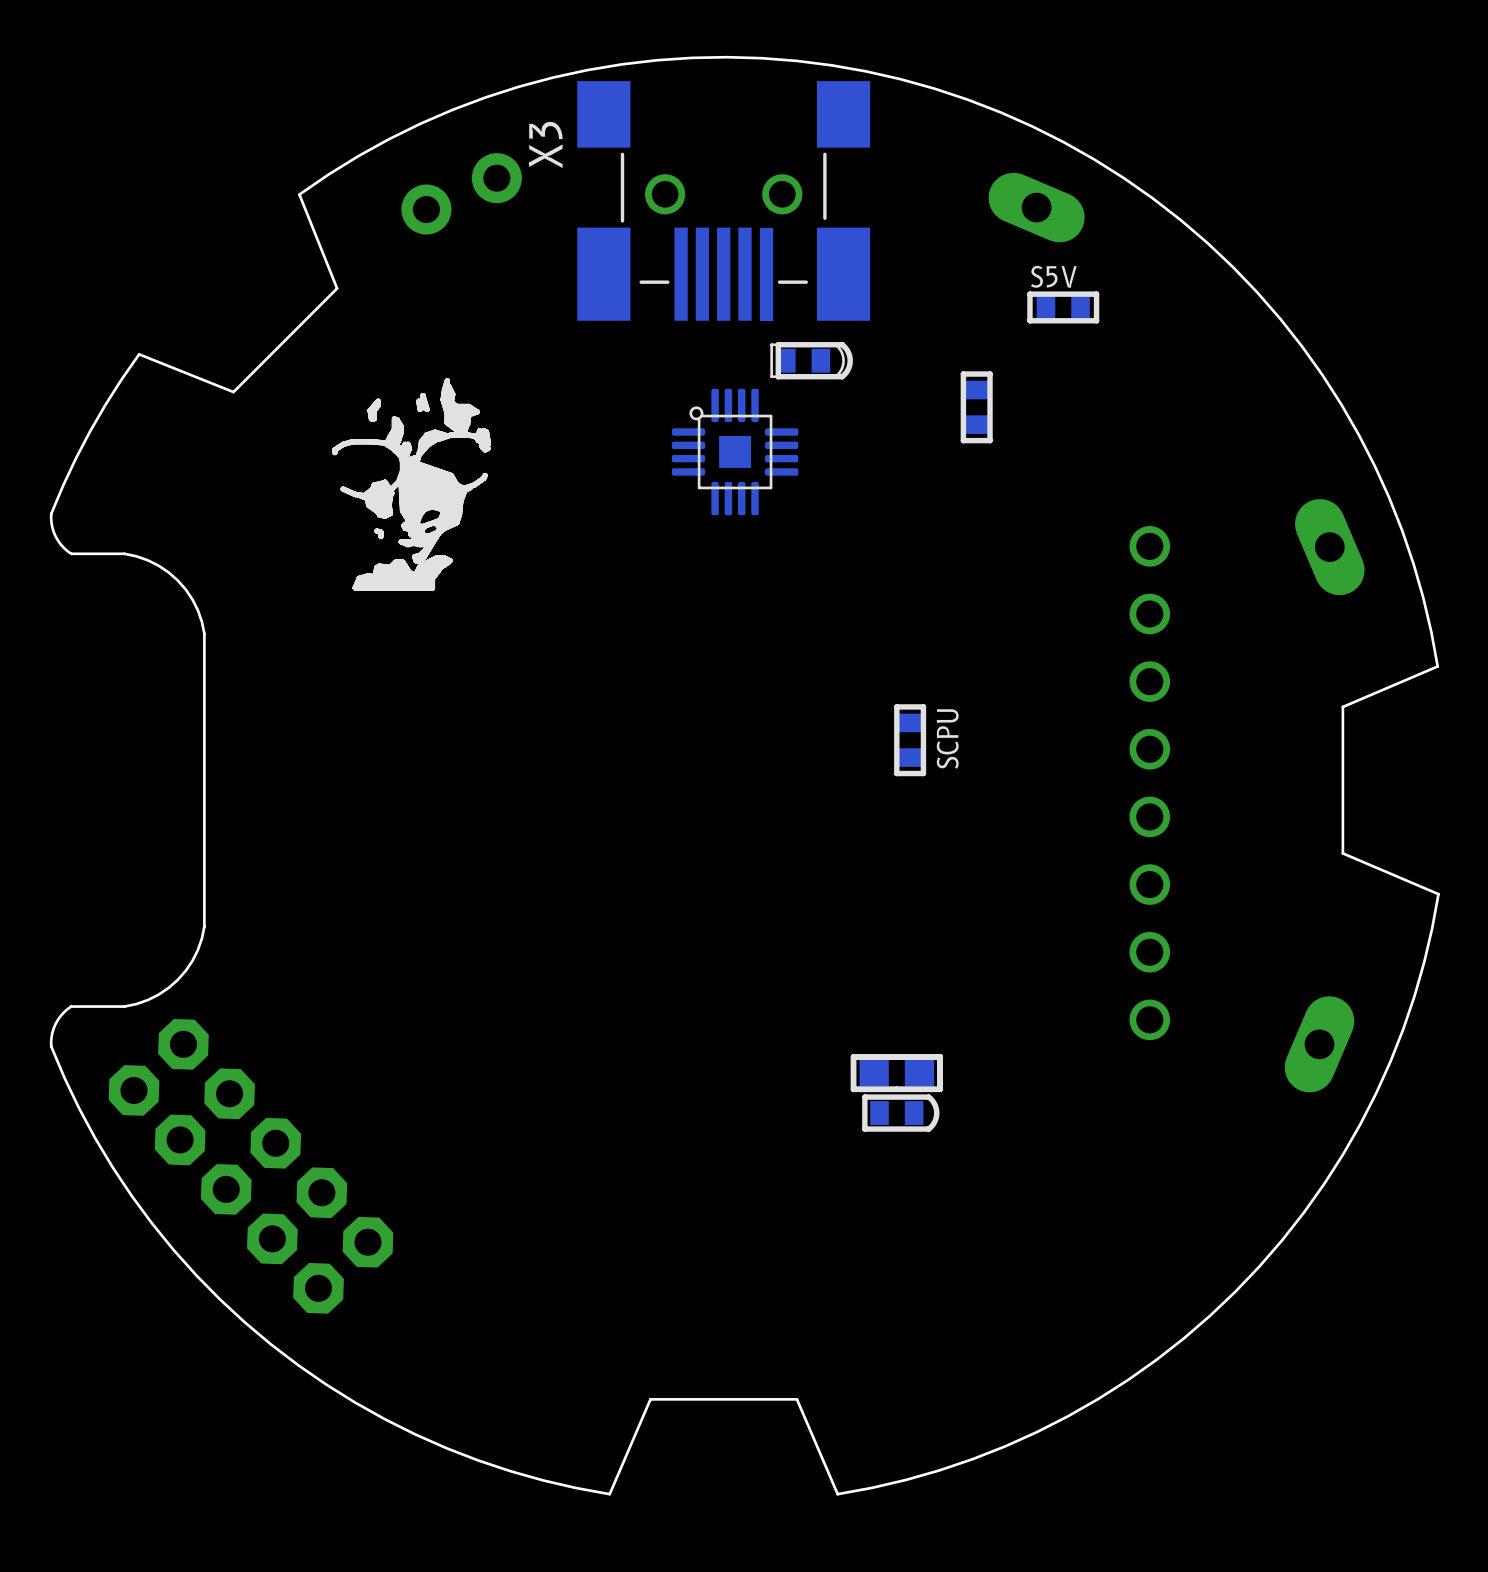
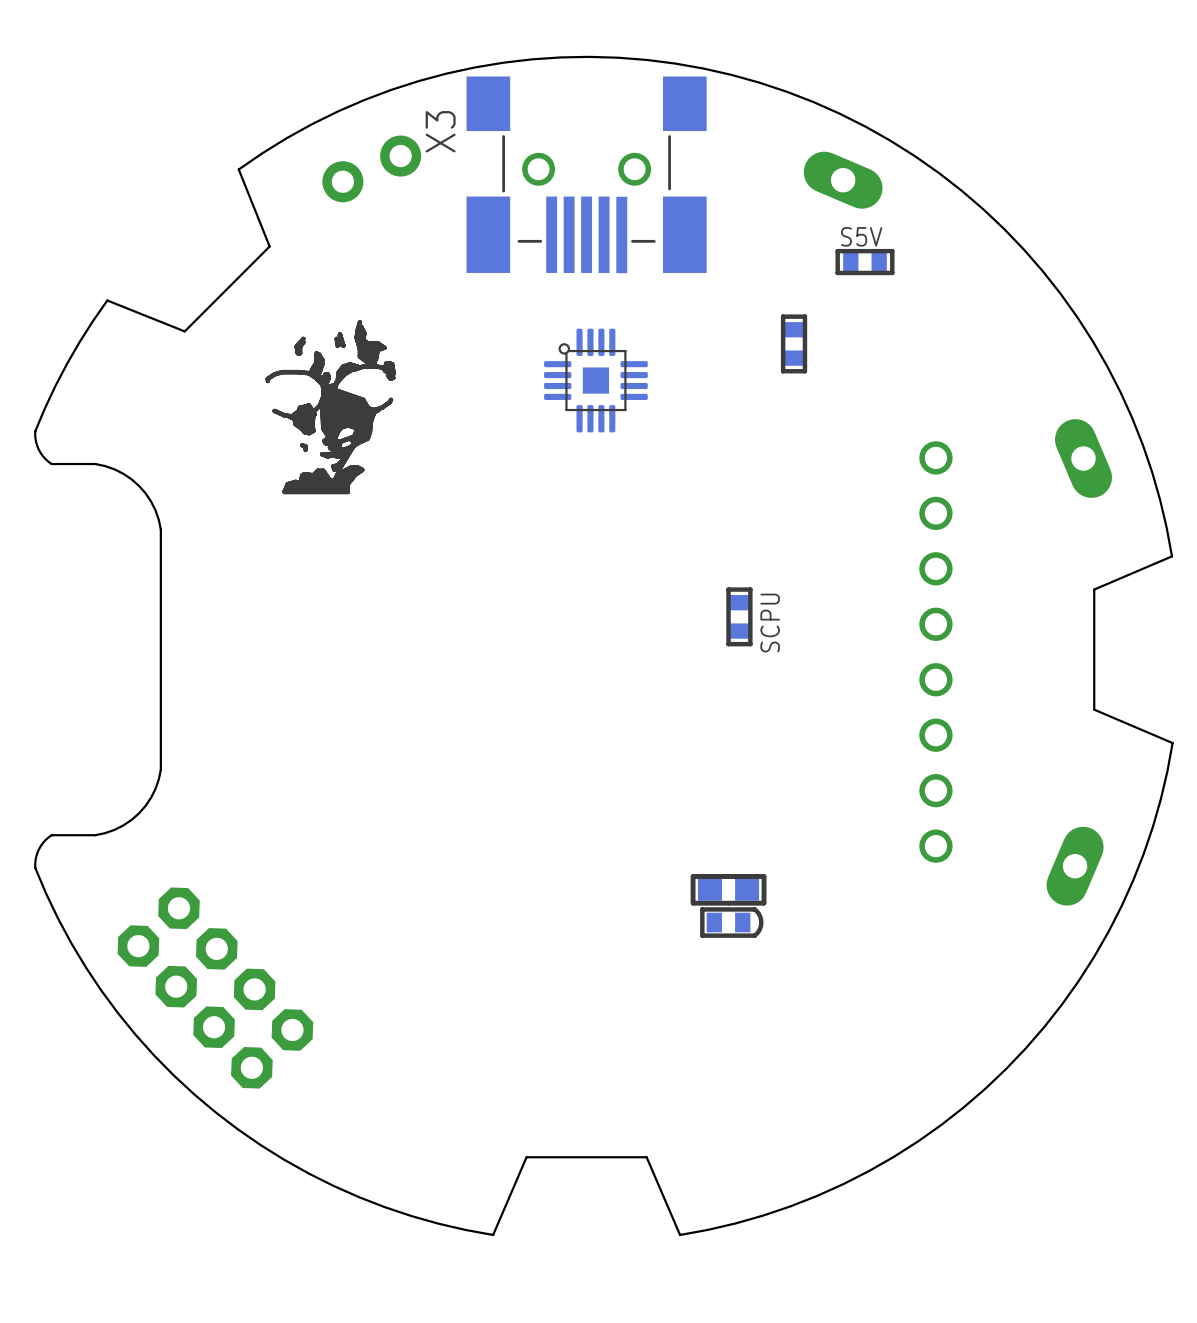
line: (842, 344) (778, 344) (778, 376) (842, 376) (848, 369) (850, 360) (848, 351) (842, 344) -> none
part: (807, 360) -> none
part: (250, 1166) -> none
part: none -> (215, 988)

